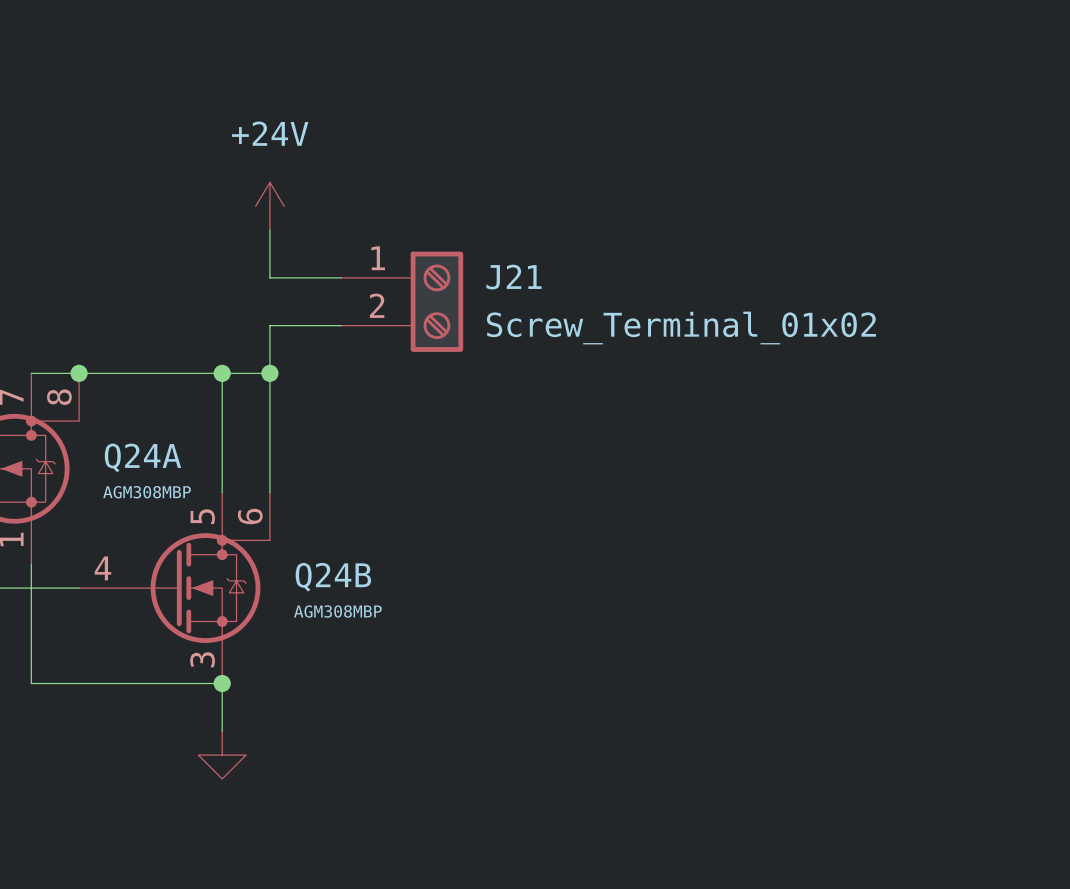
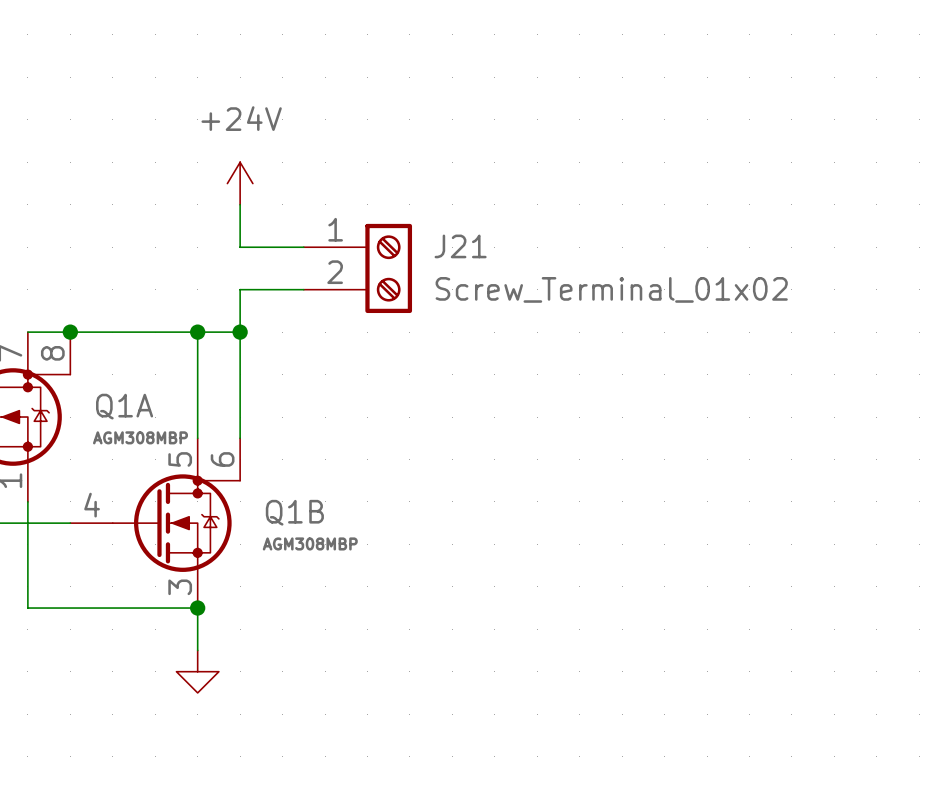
Q24A name: Q24A (142, 457) -> Q1A (124, 406)
Q24B name: Q24B (333, 577) -> Q1B (294, 512)

